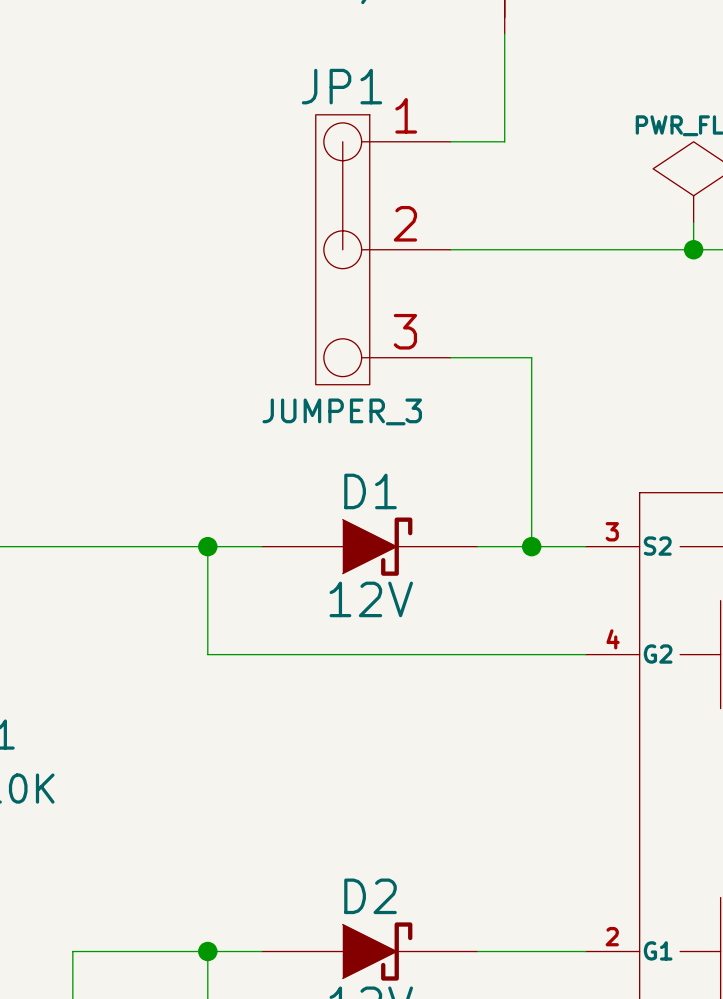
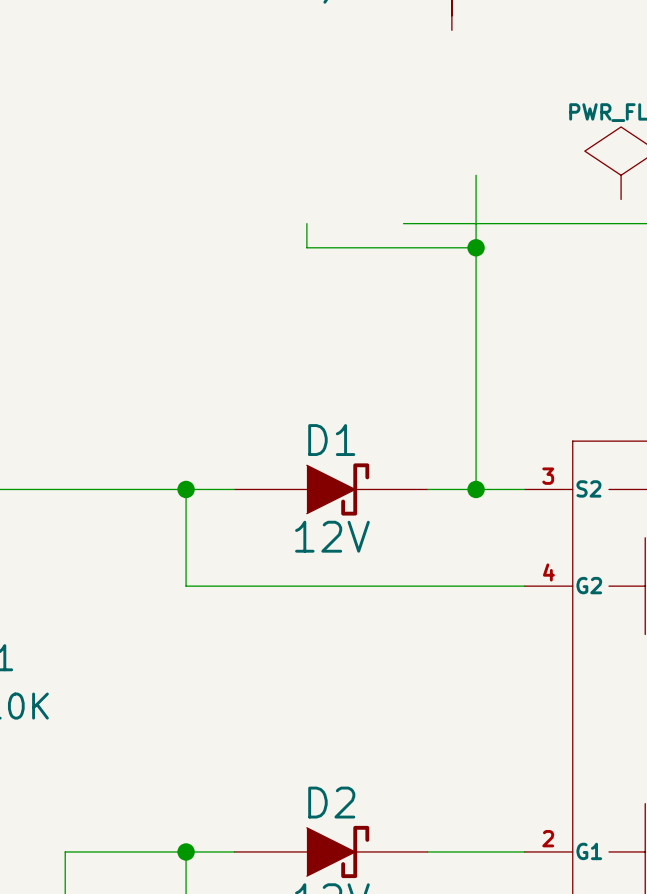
wire: (504, 33) (504, 141) (450, 141) -> none
wire: (693, 222) (693, 249) -> none
wire: none -> (306, 223) (306, 247) (476, 247)
JP1: JUMPER_3 (383, 249) -> none
junction: (693, 249) -> none
junction: none -> (476, 247)
wire: (450, 357) (531, 357) -> (476, 175) (476, 320)

